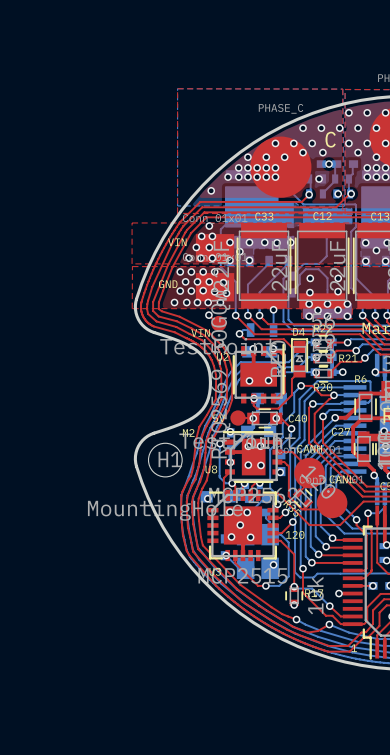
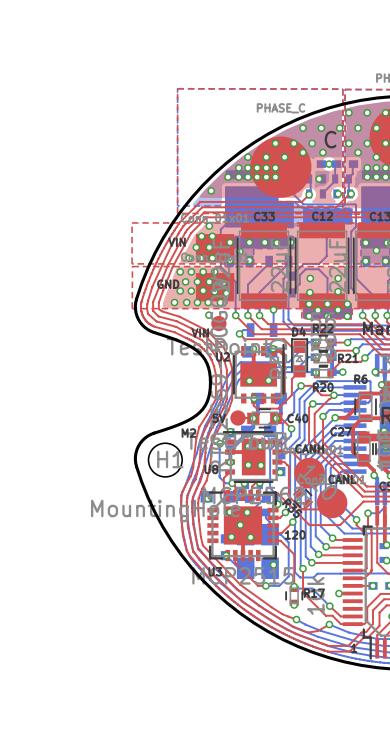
via: none -> (381, 384)

